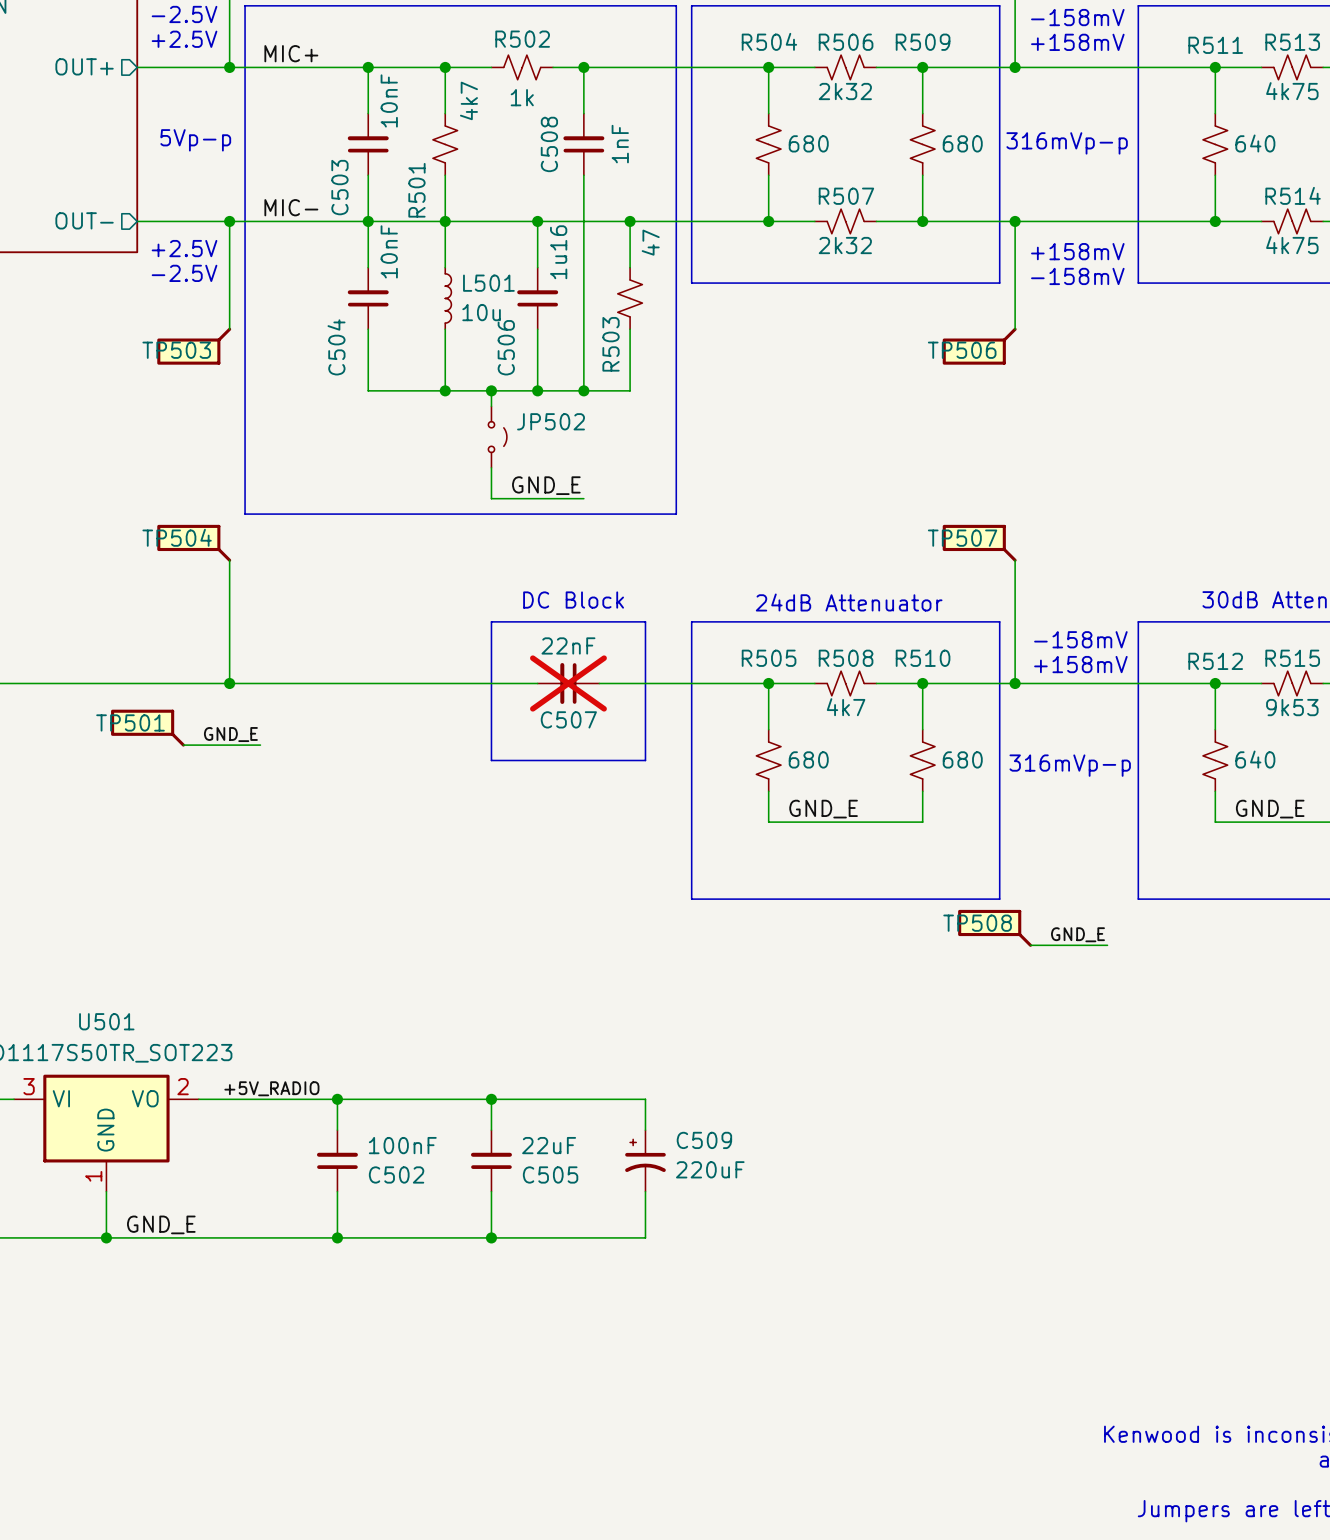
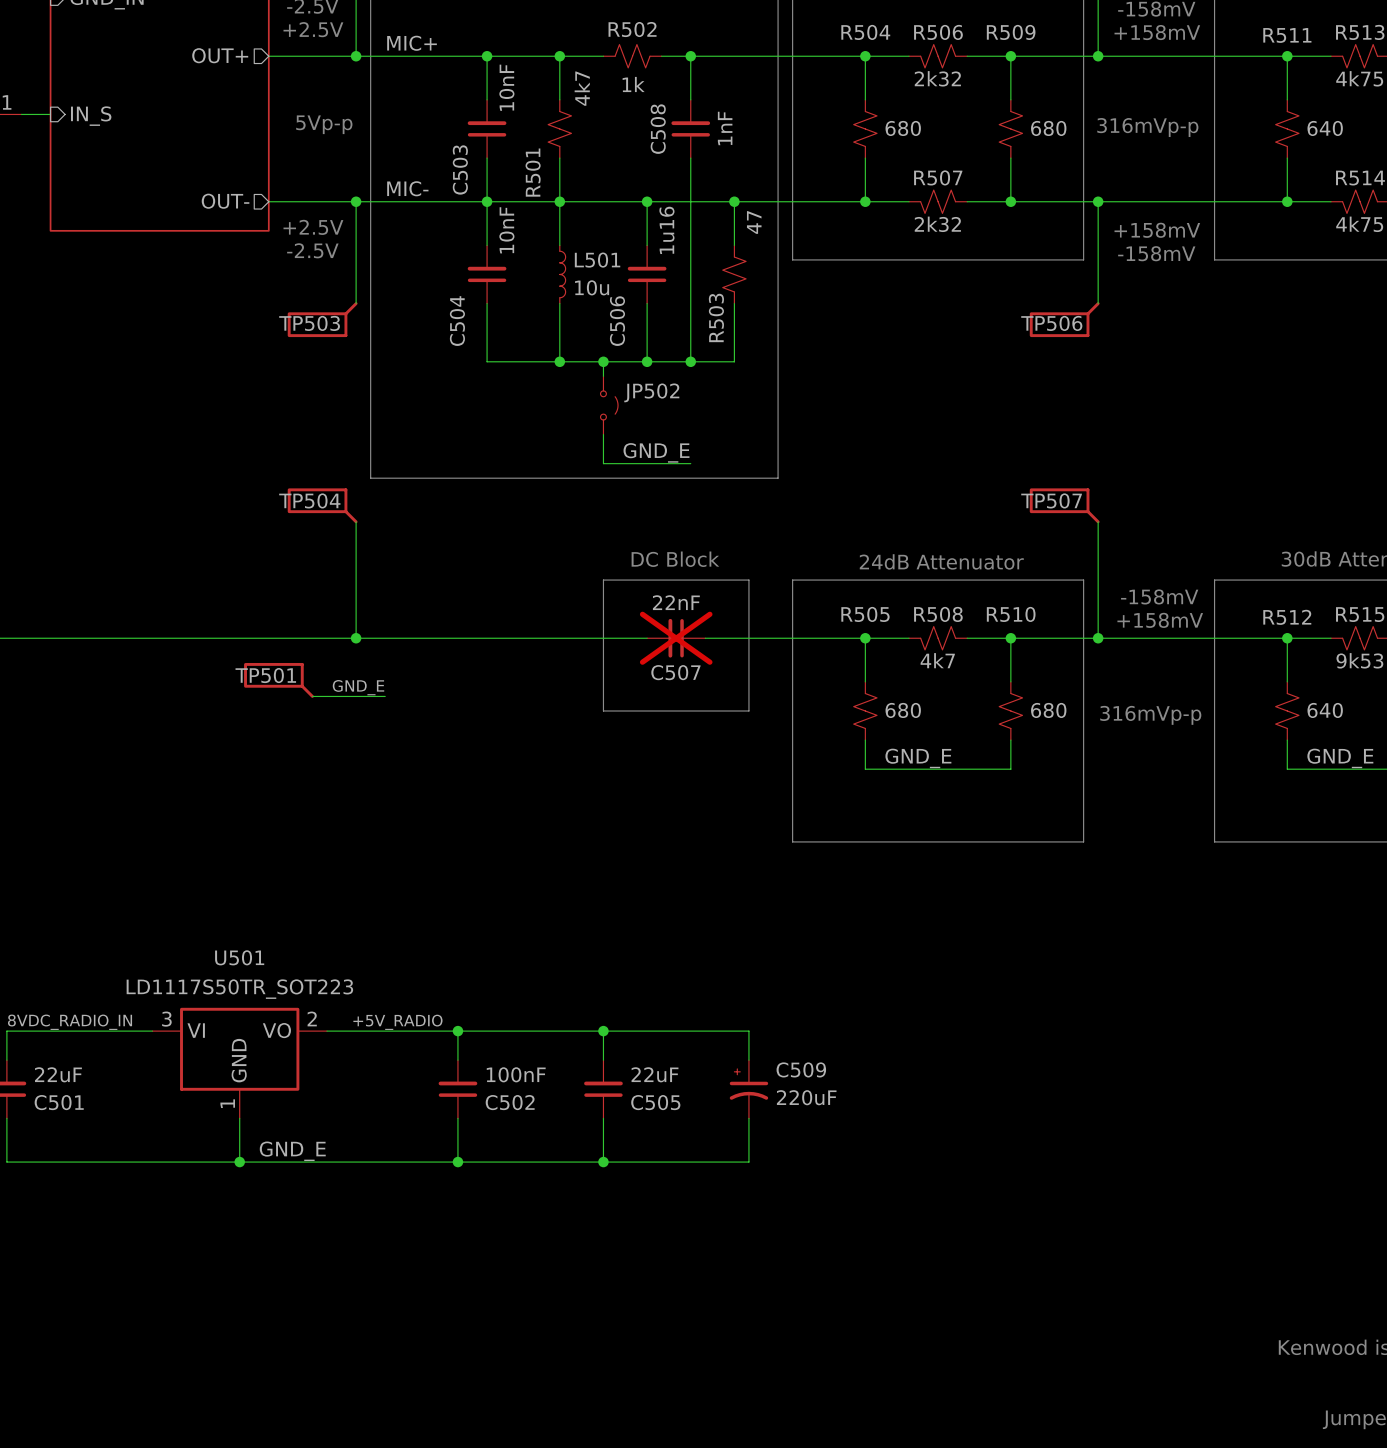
TP508: (995, 928) -> none
label: GND_E (1077, 934) -> none
wire: (1030, 945) (1107, 945) -> none

